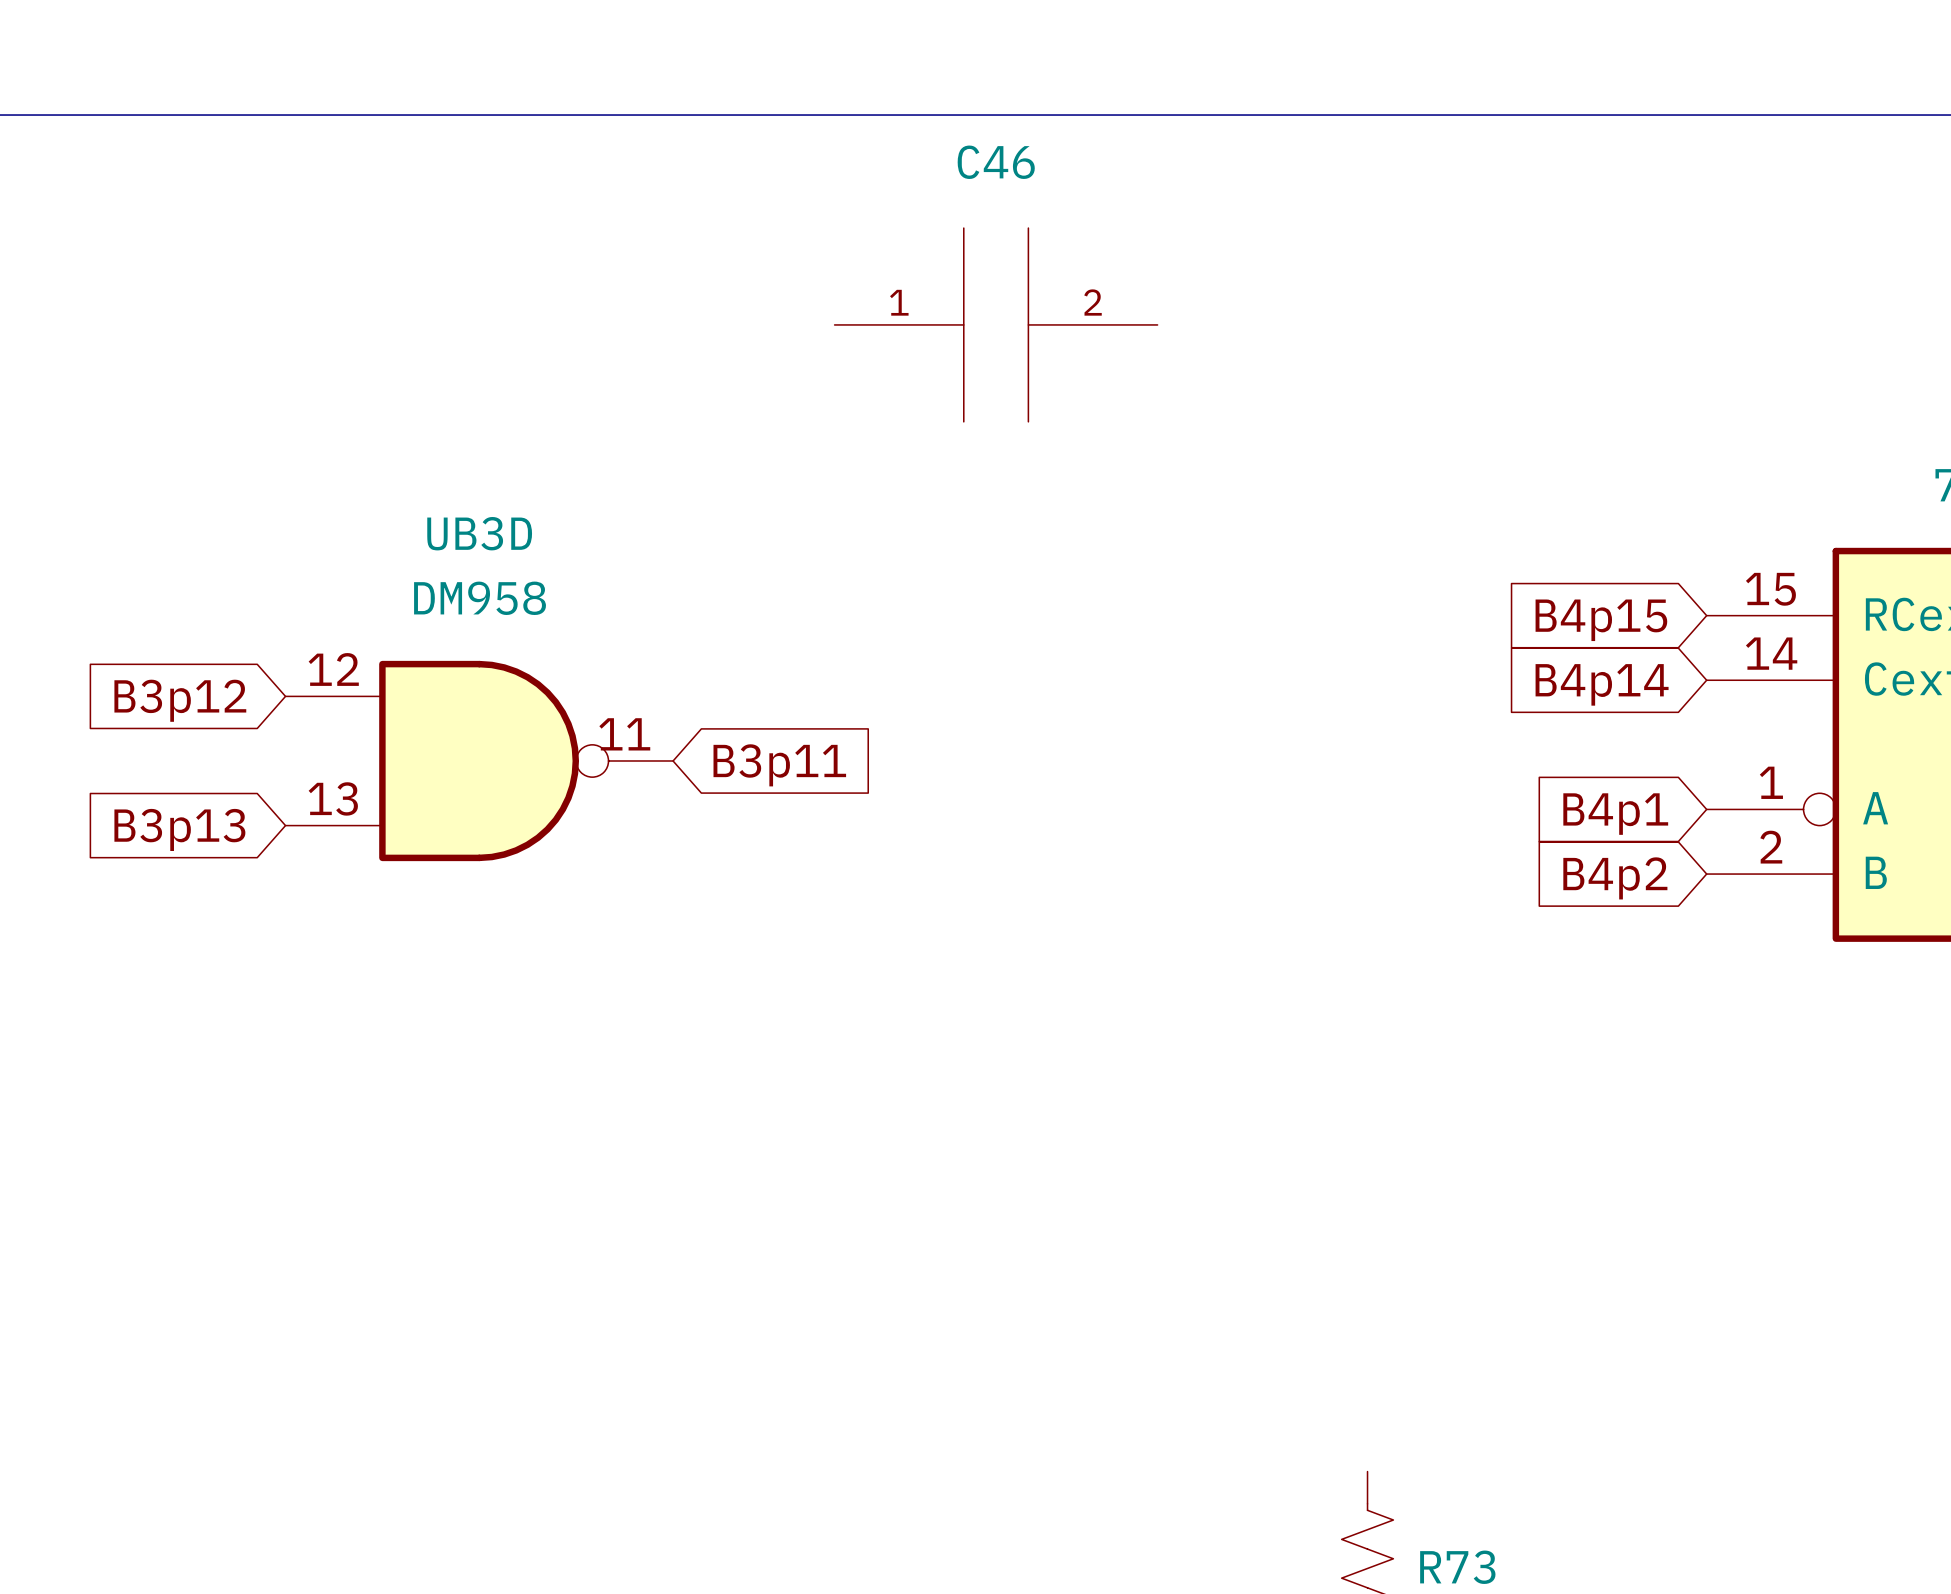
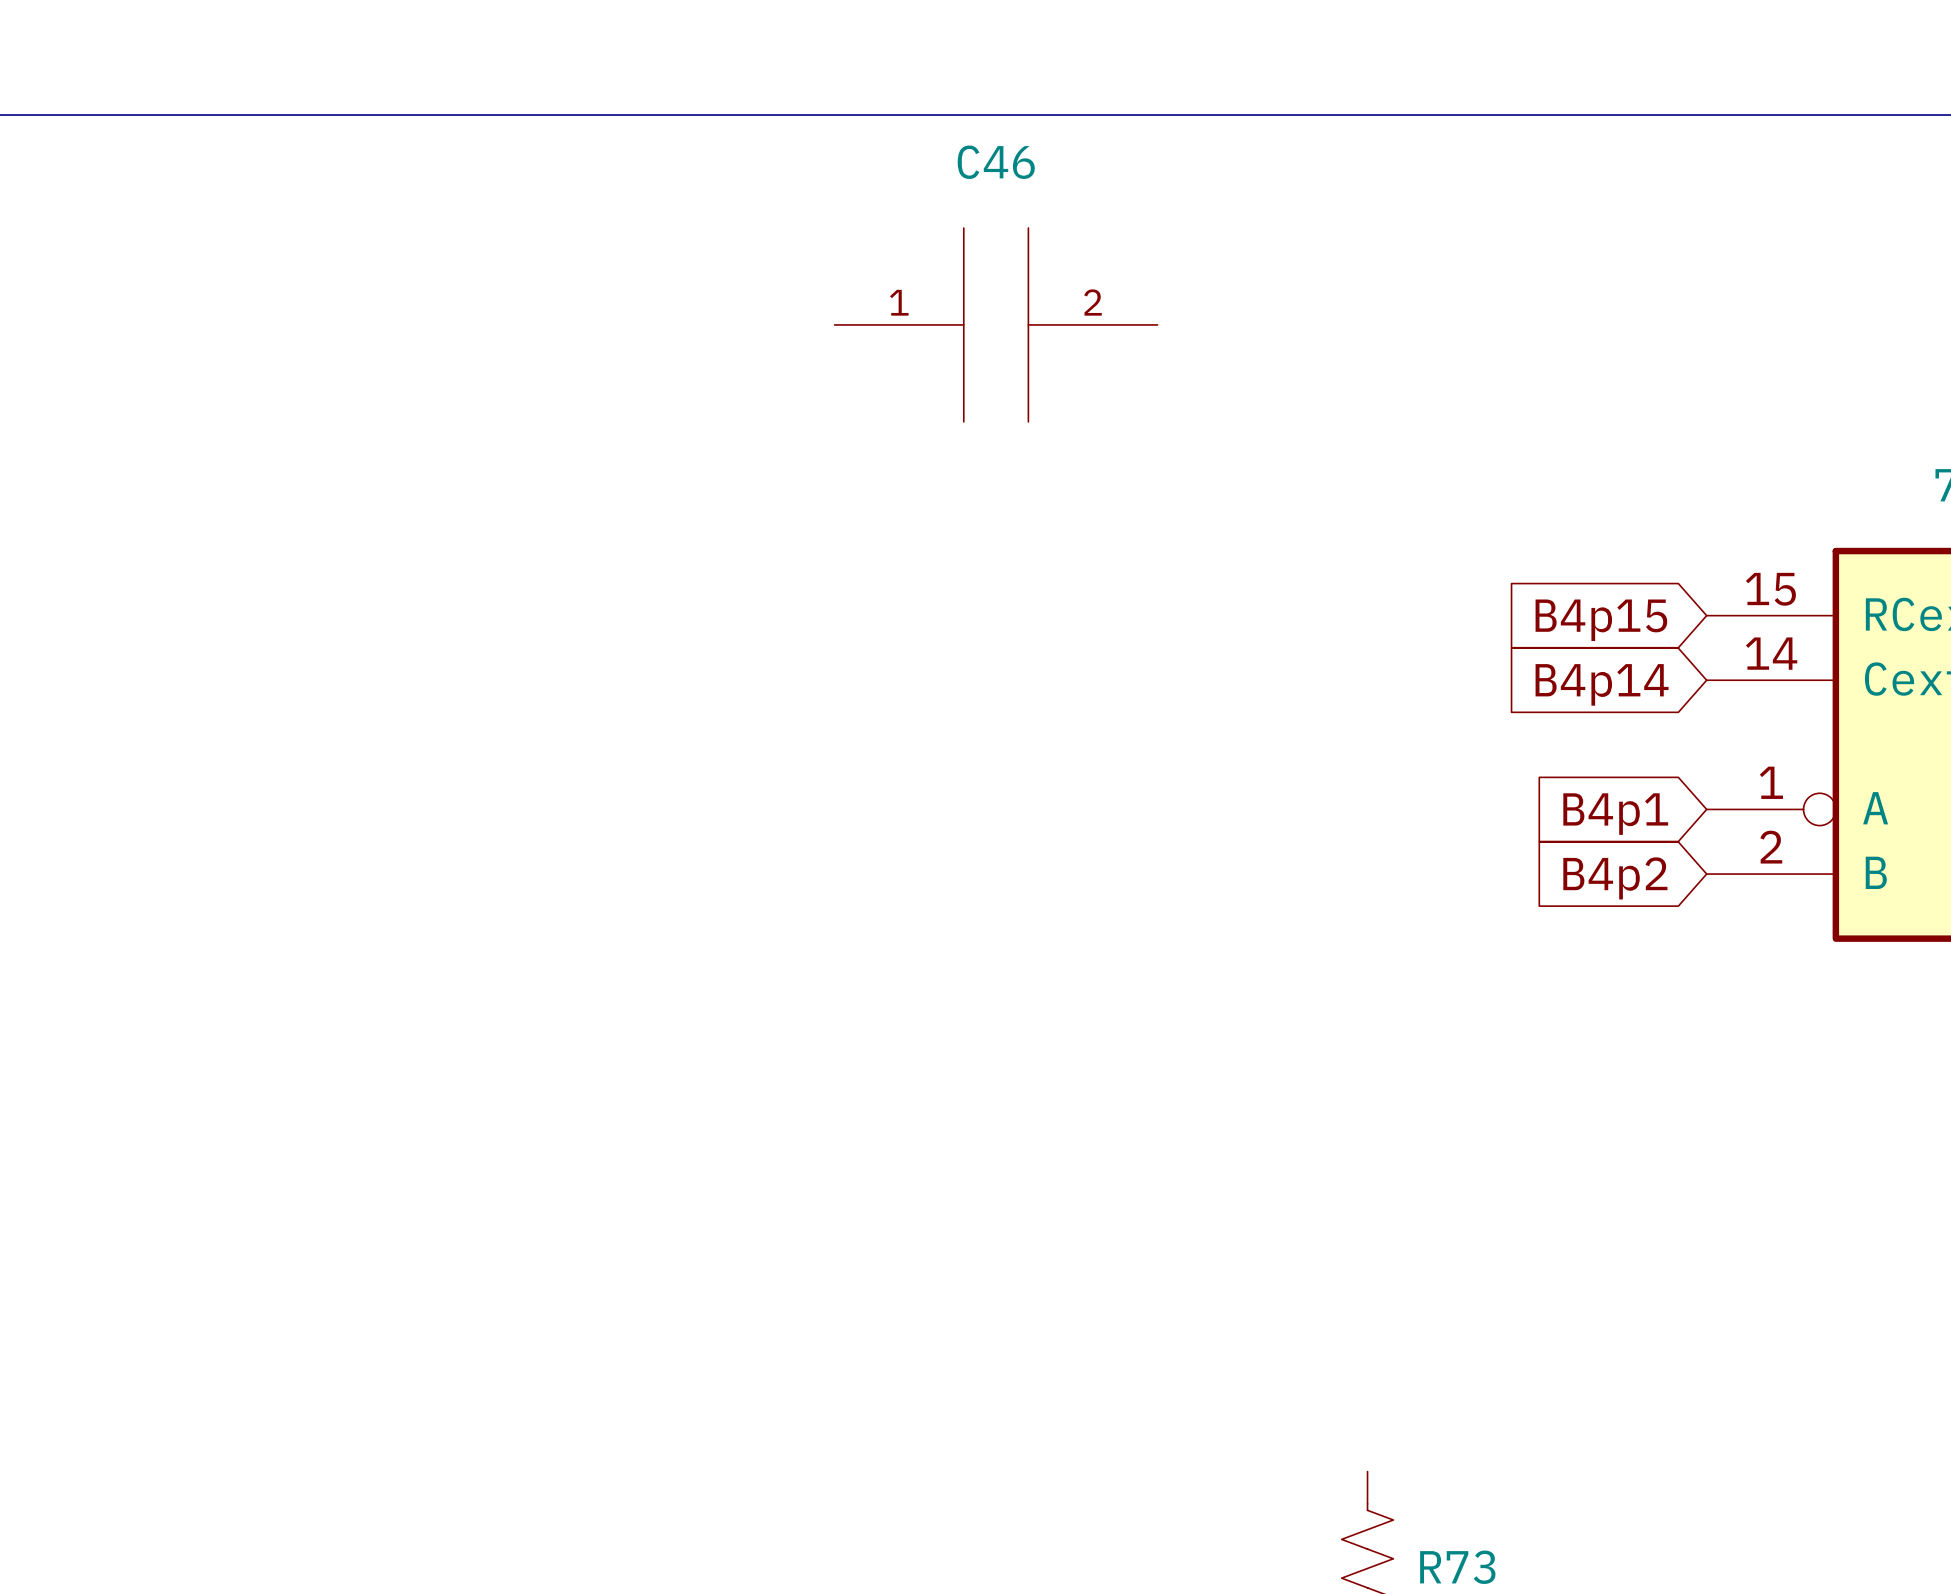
global label: B3p12 (180, 700) -> none
UB3D: DM958 (479, 760) -> none
global label: B3p11 (779, 765) -> none
global label: B3p13 (179, 829) -> none

